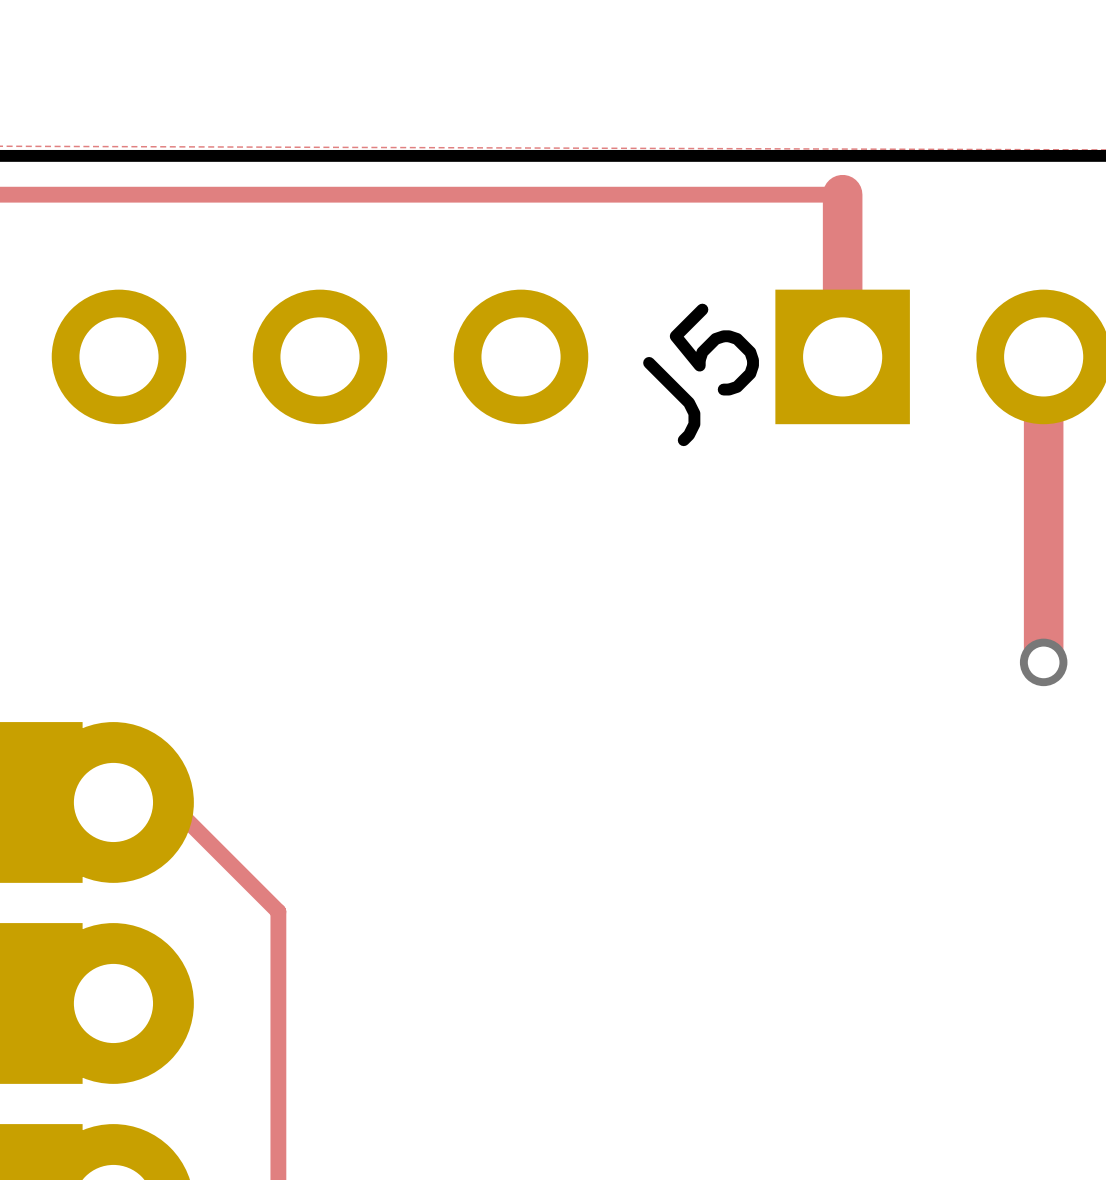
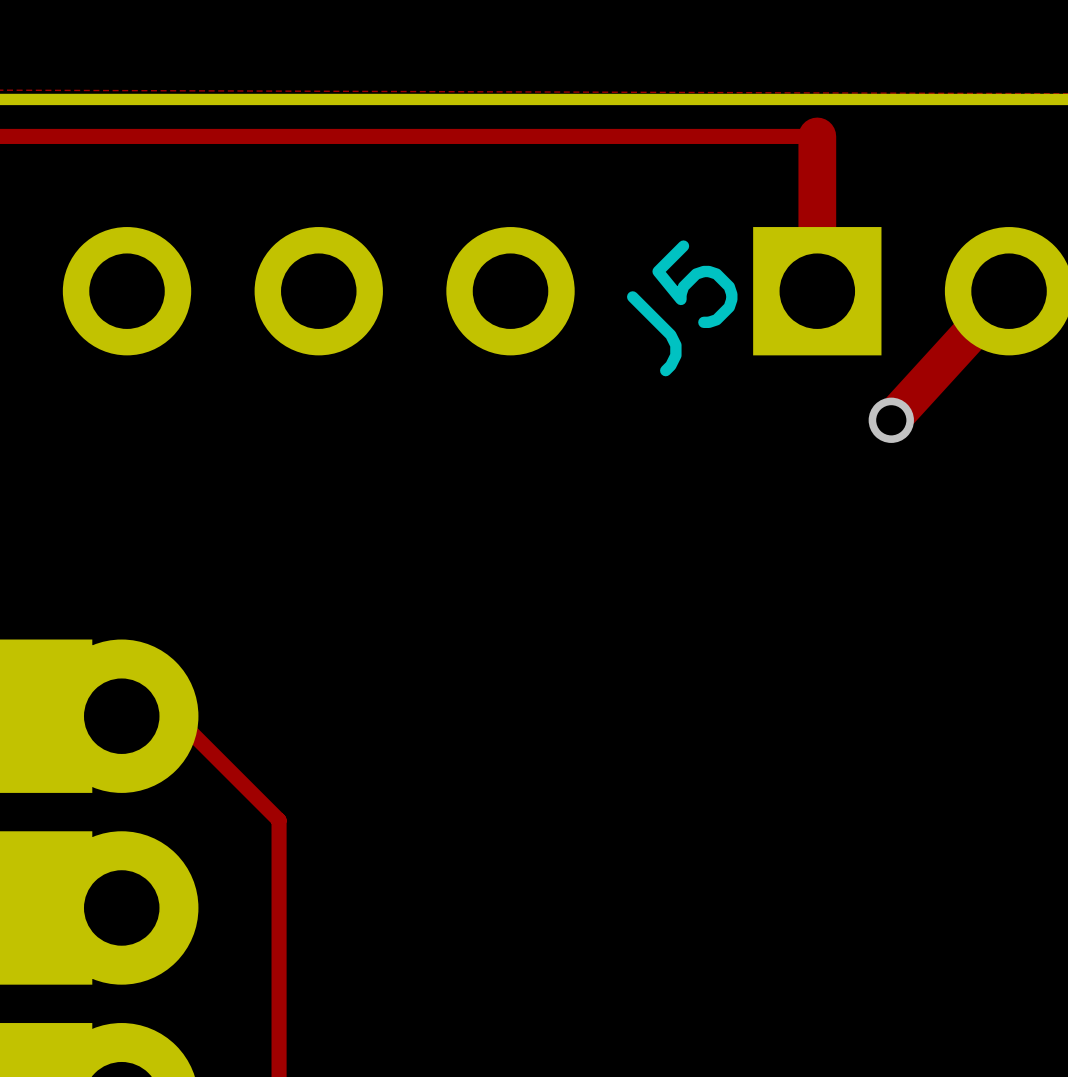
track: (1043, 356) (1043, 662) -> (1009, 291) (891, 420)
via position: (1043, 662) -> (891, 420)

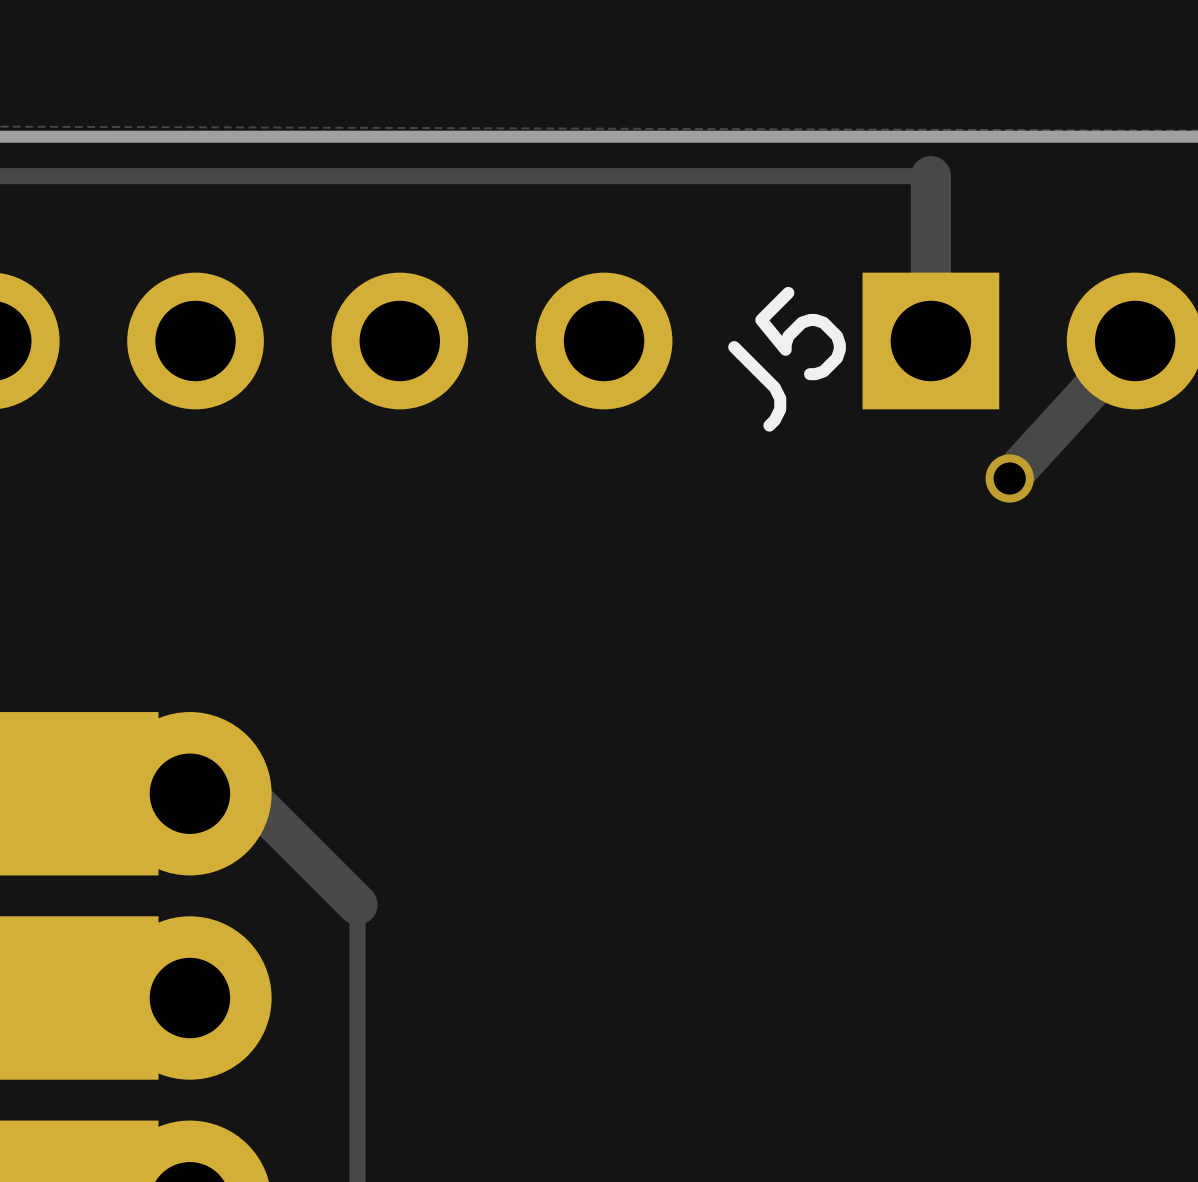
track width: thin (174, 716) (279, 820) -> thick (246, 793) (357, 904)

